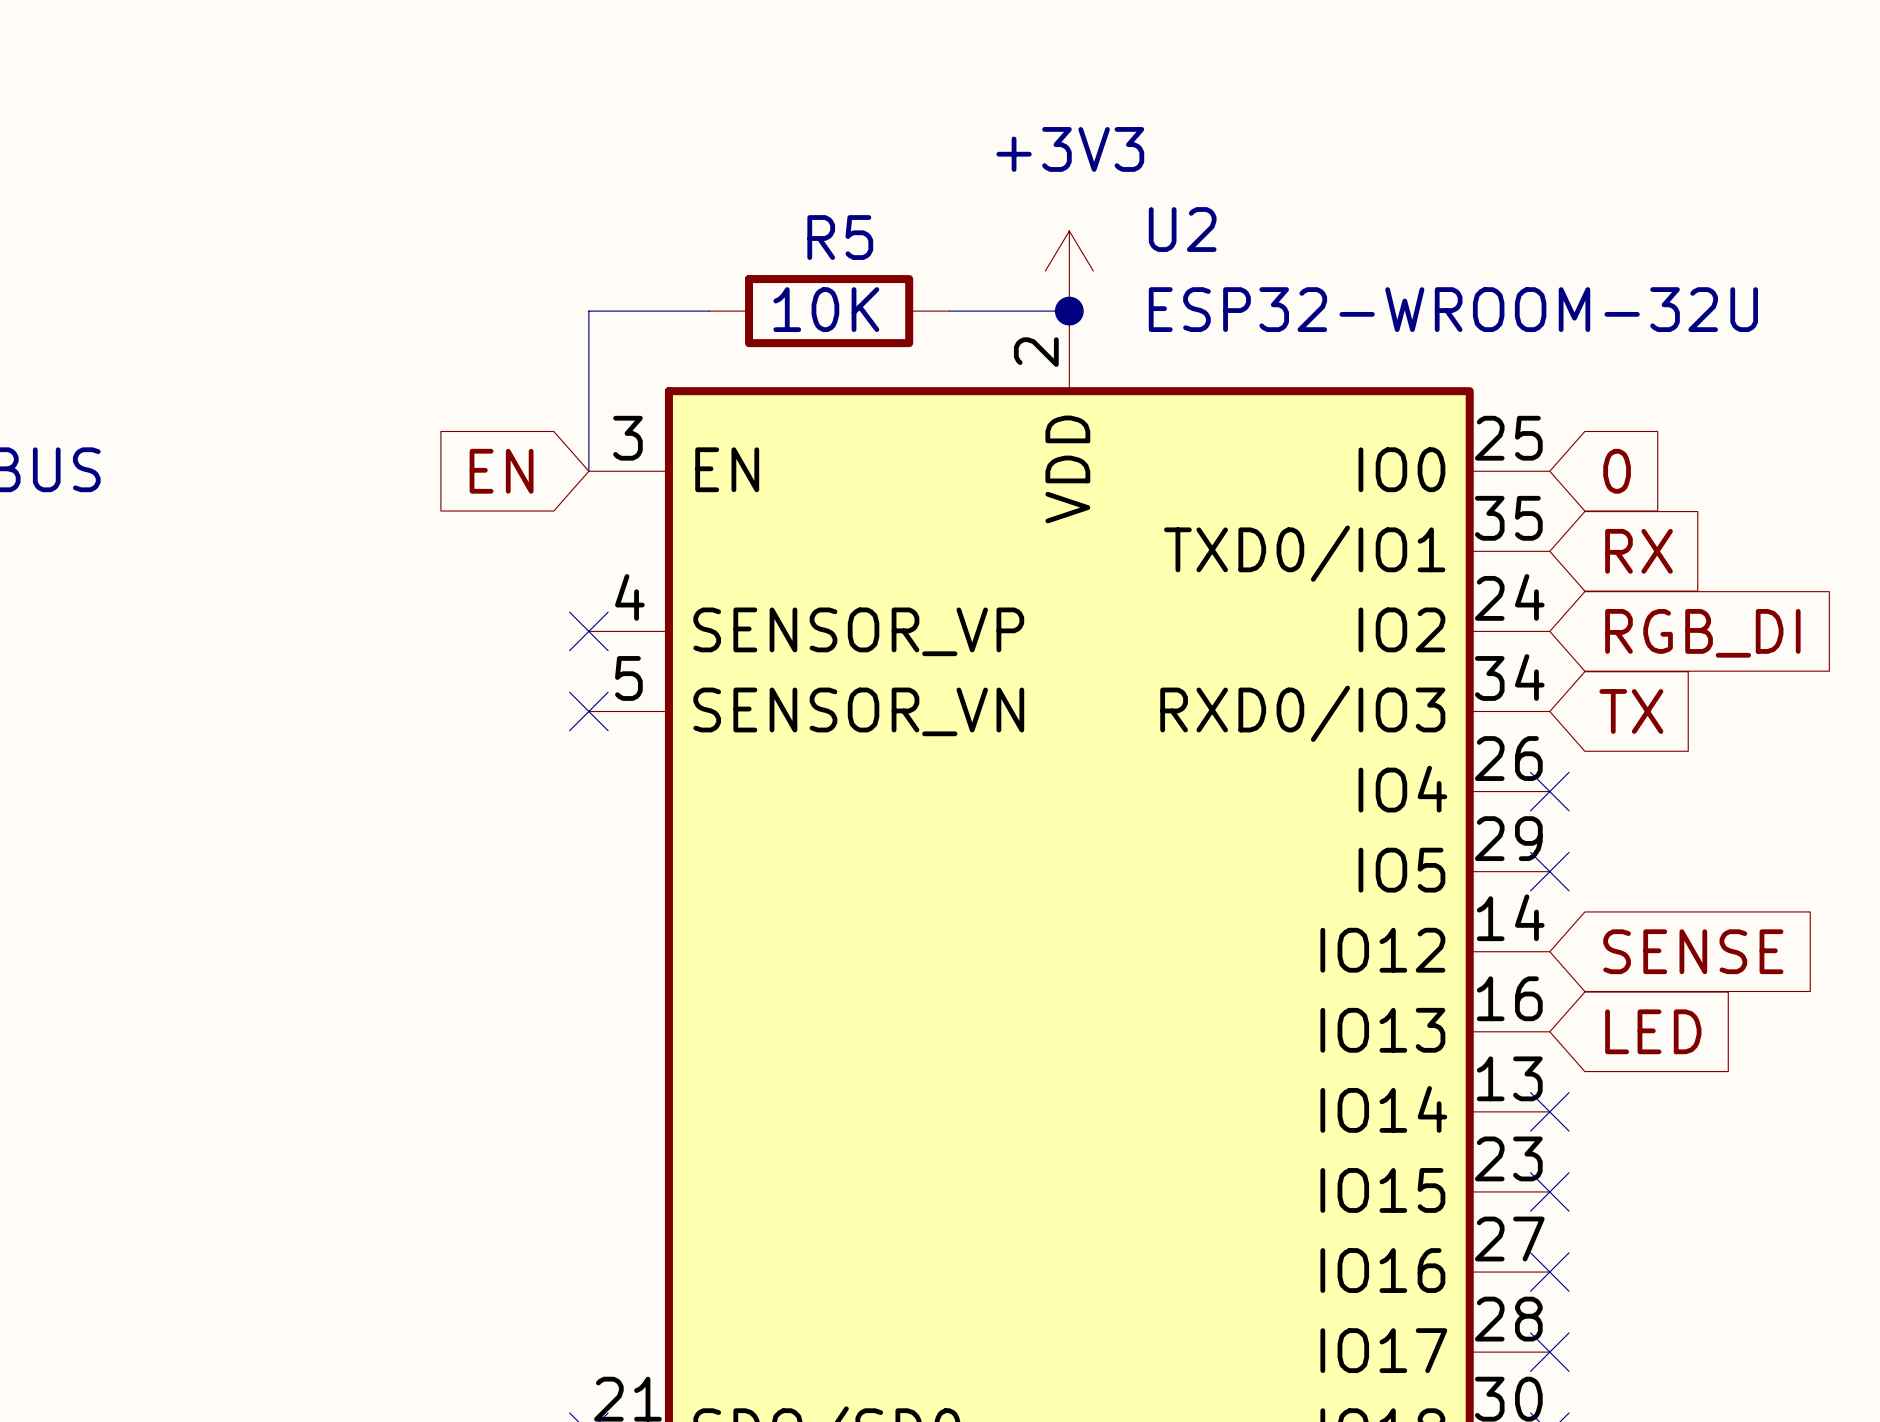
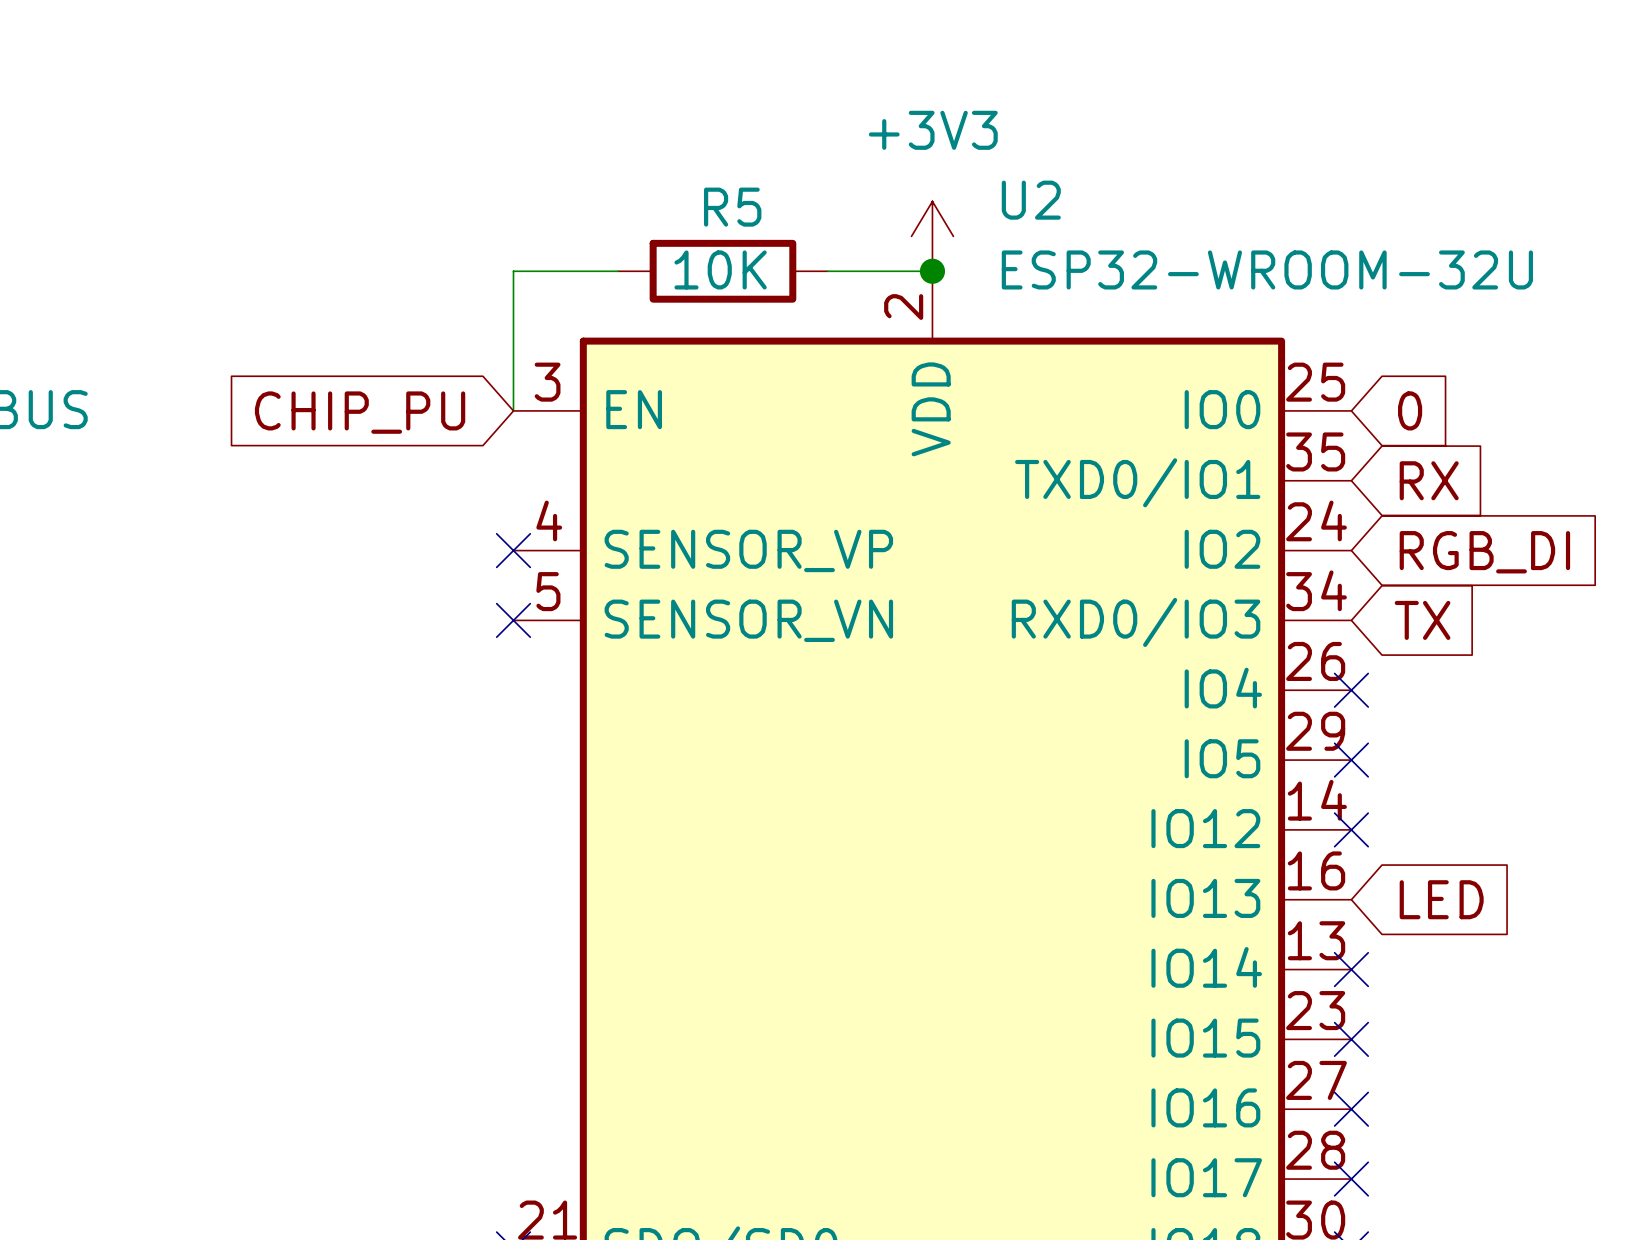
global label: EN (501, 471) -> CHIP_PU (360, 412)
no-connect mark: none -> (1351, 829)
global label: SENSE (1693, 951) -> none

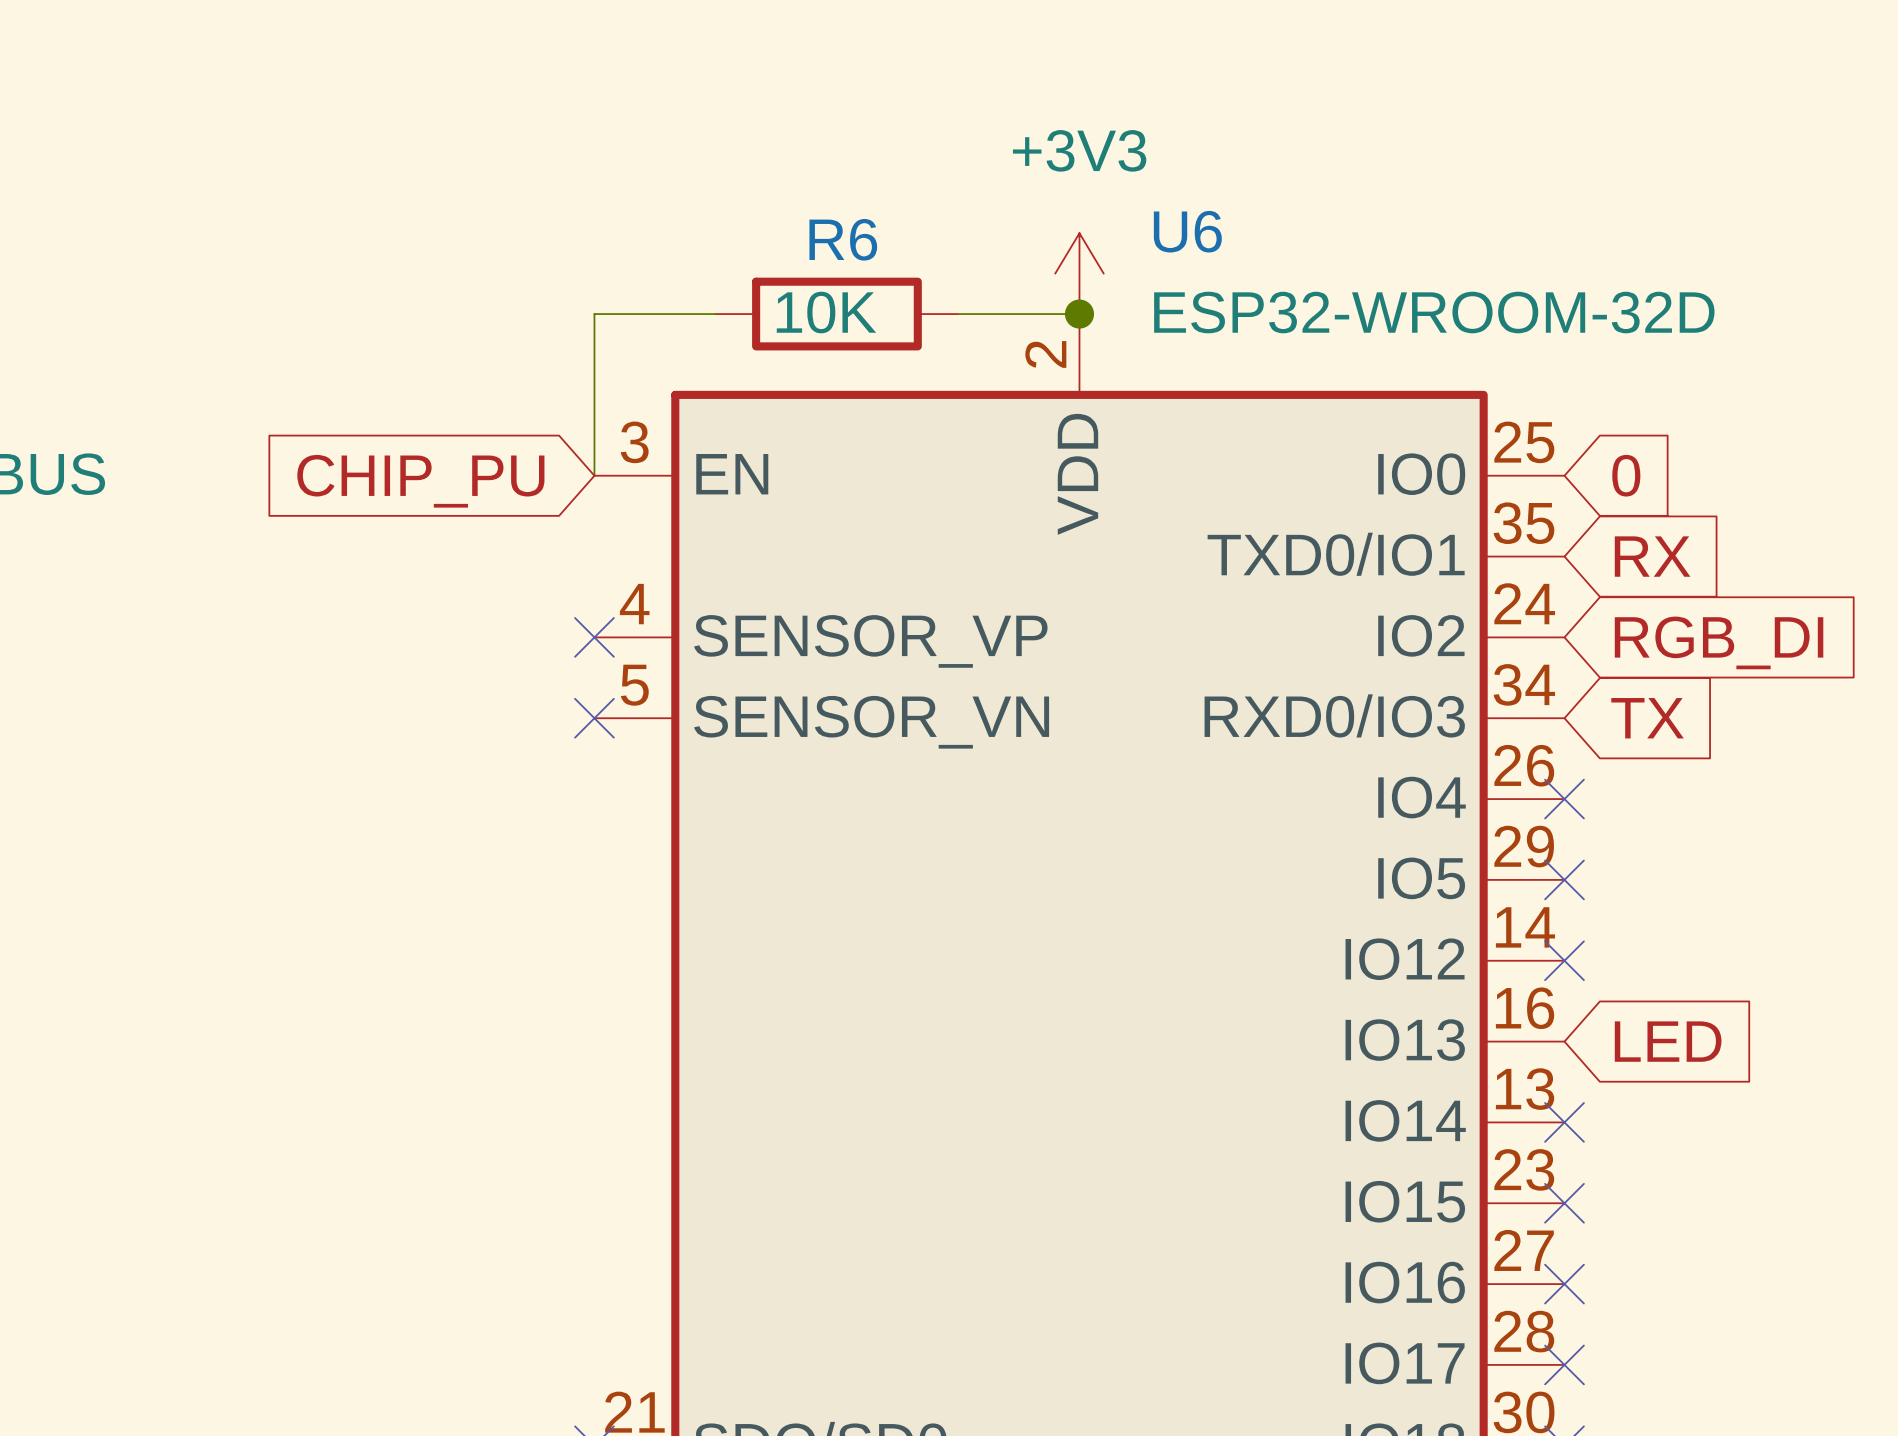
U2 name: U2 (1031, 200) -> U6 (1187, 231)
R5 name: R5 (732, 207) -> R6 (843, 239)
U2 value: ESP32-WROOM-32U (1267, 269) -> ESP32-WROOM-32D (1434, 312)

